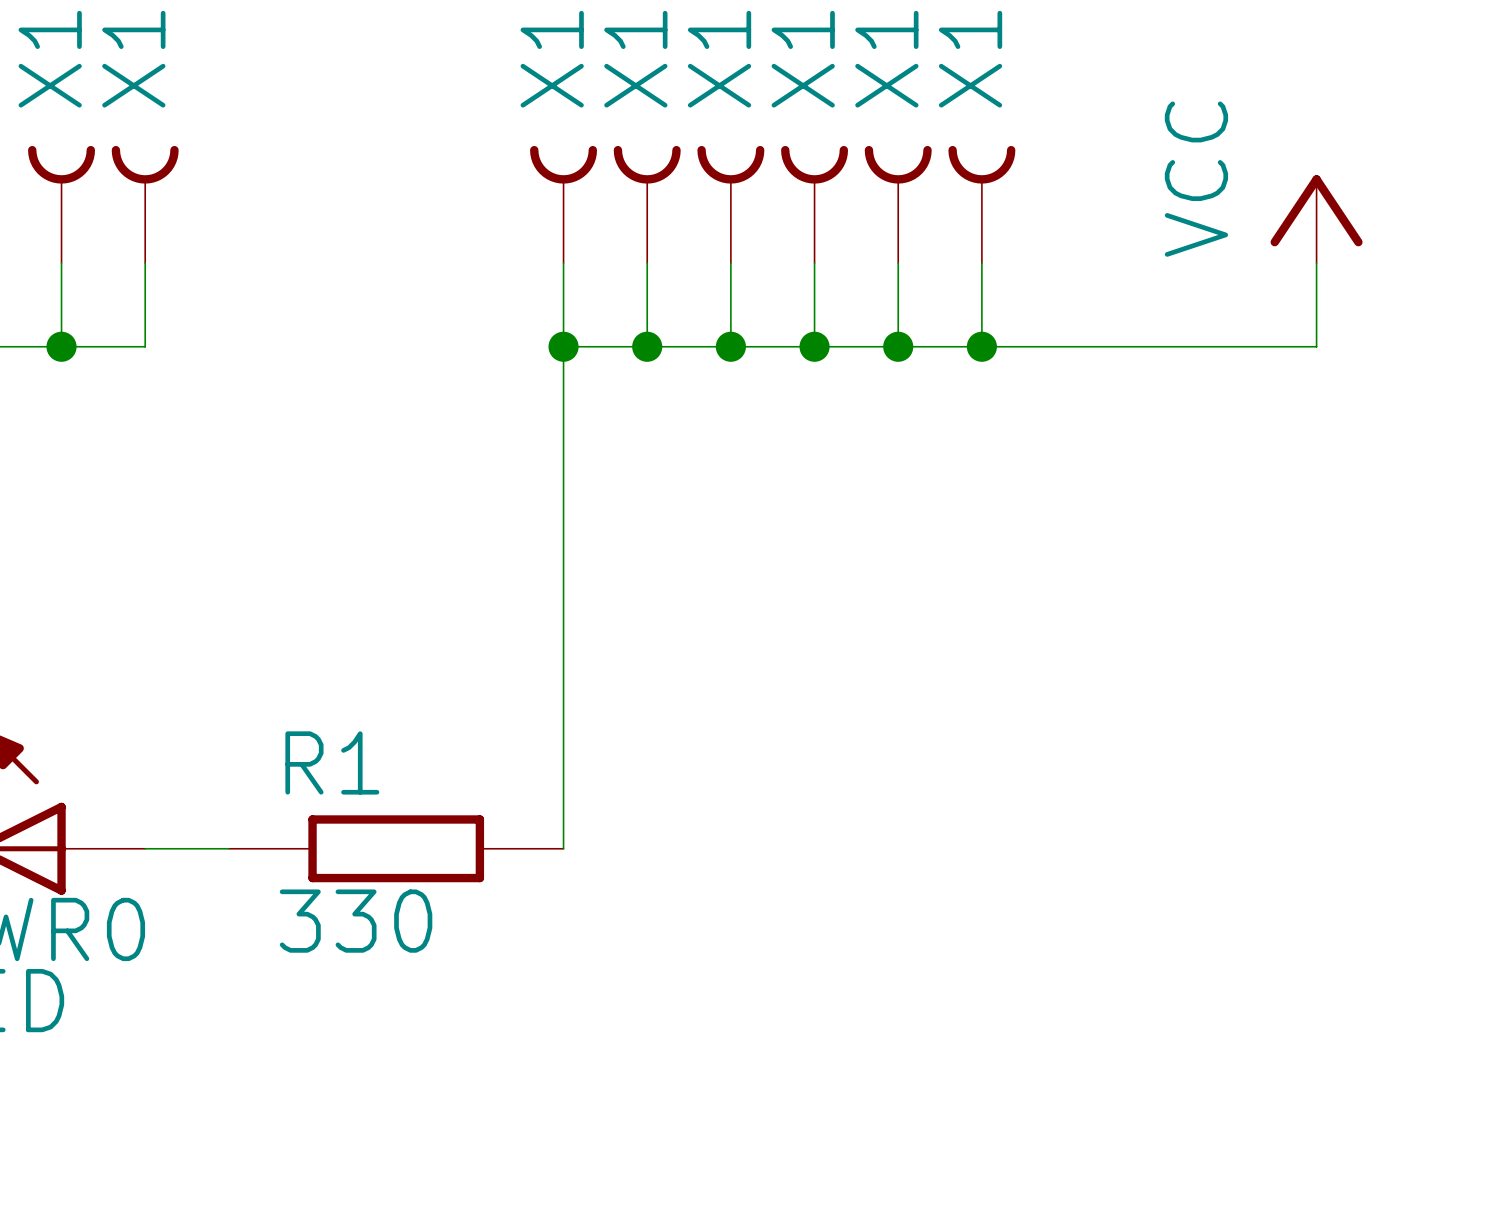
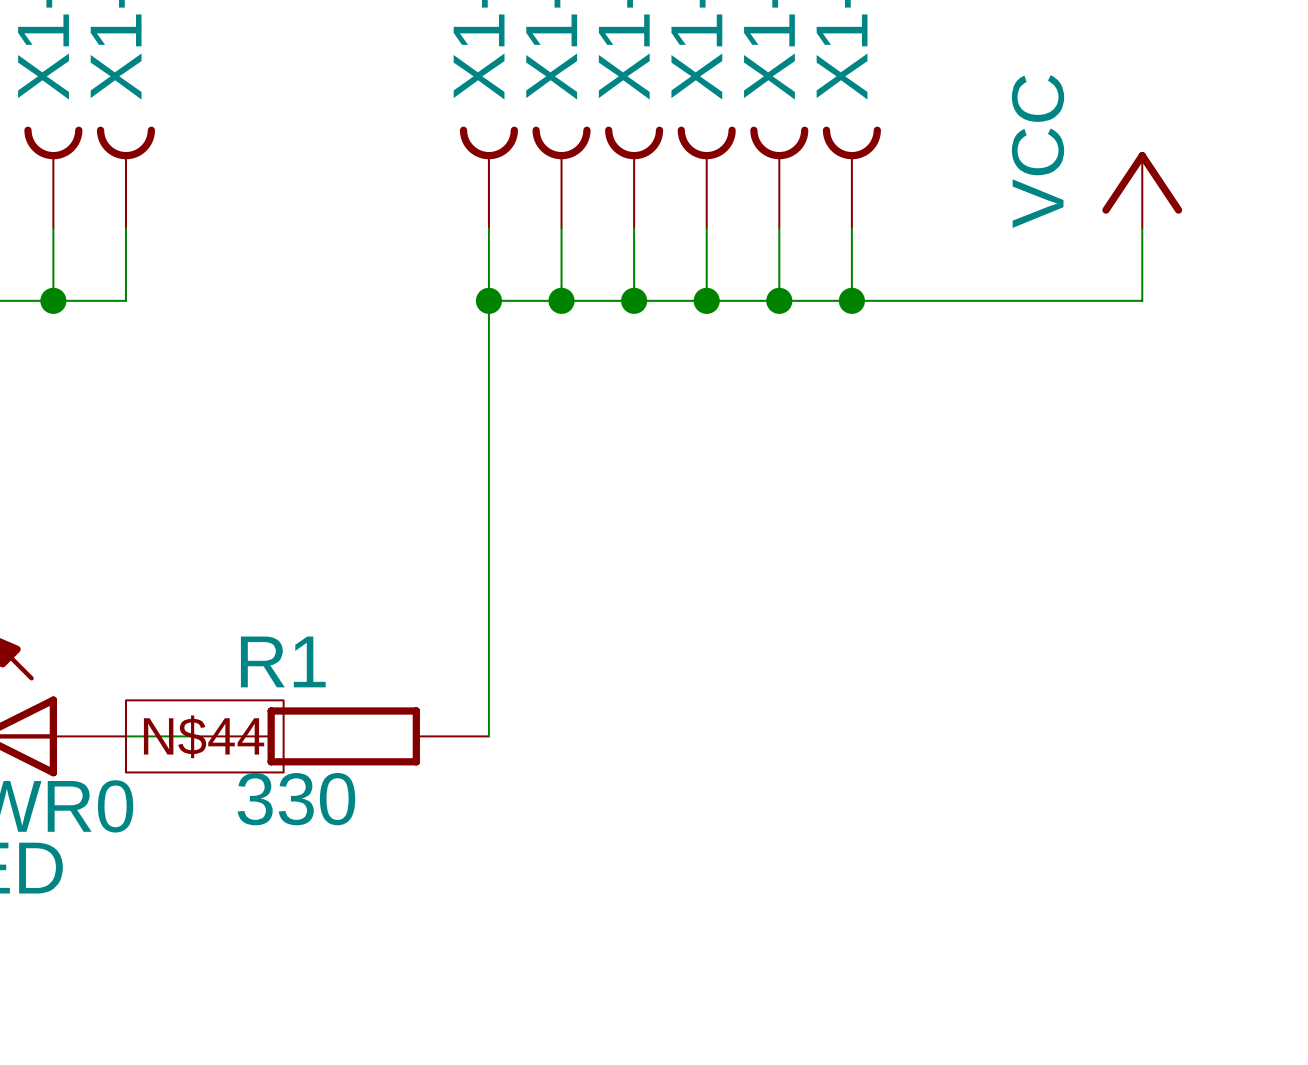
global label: none -> N$44 (204, 736)

